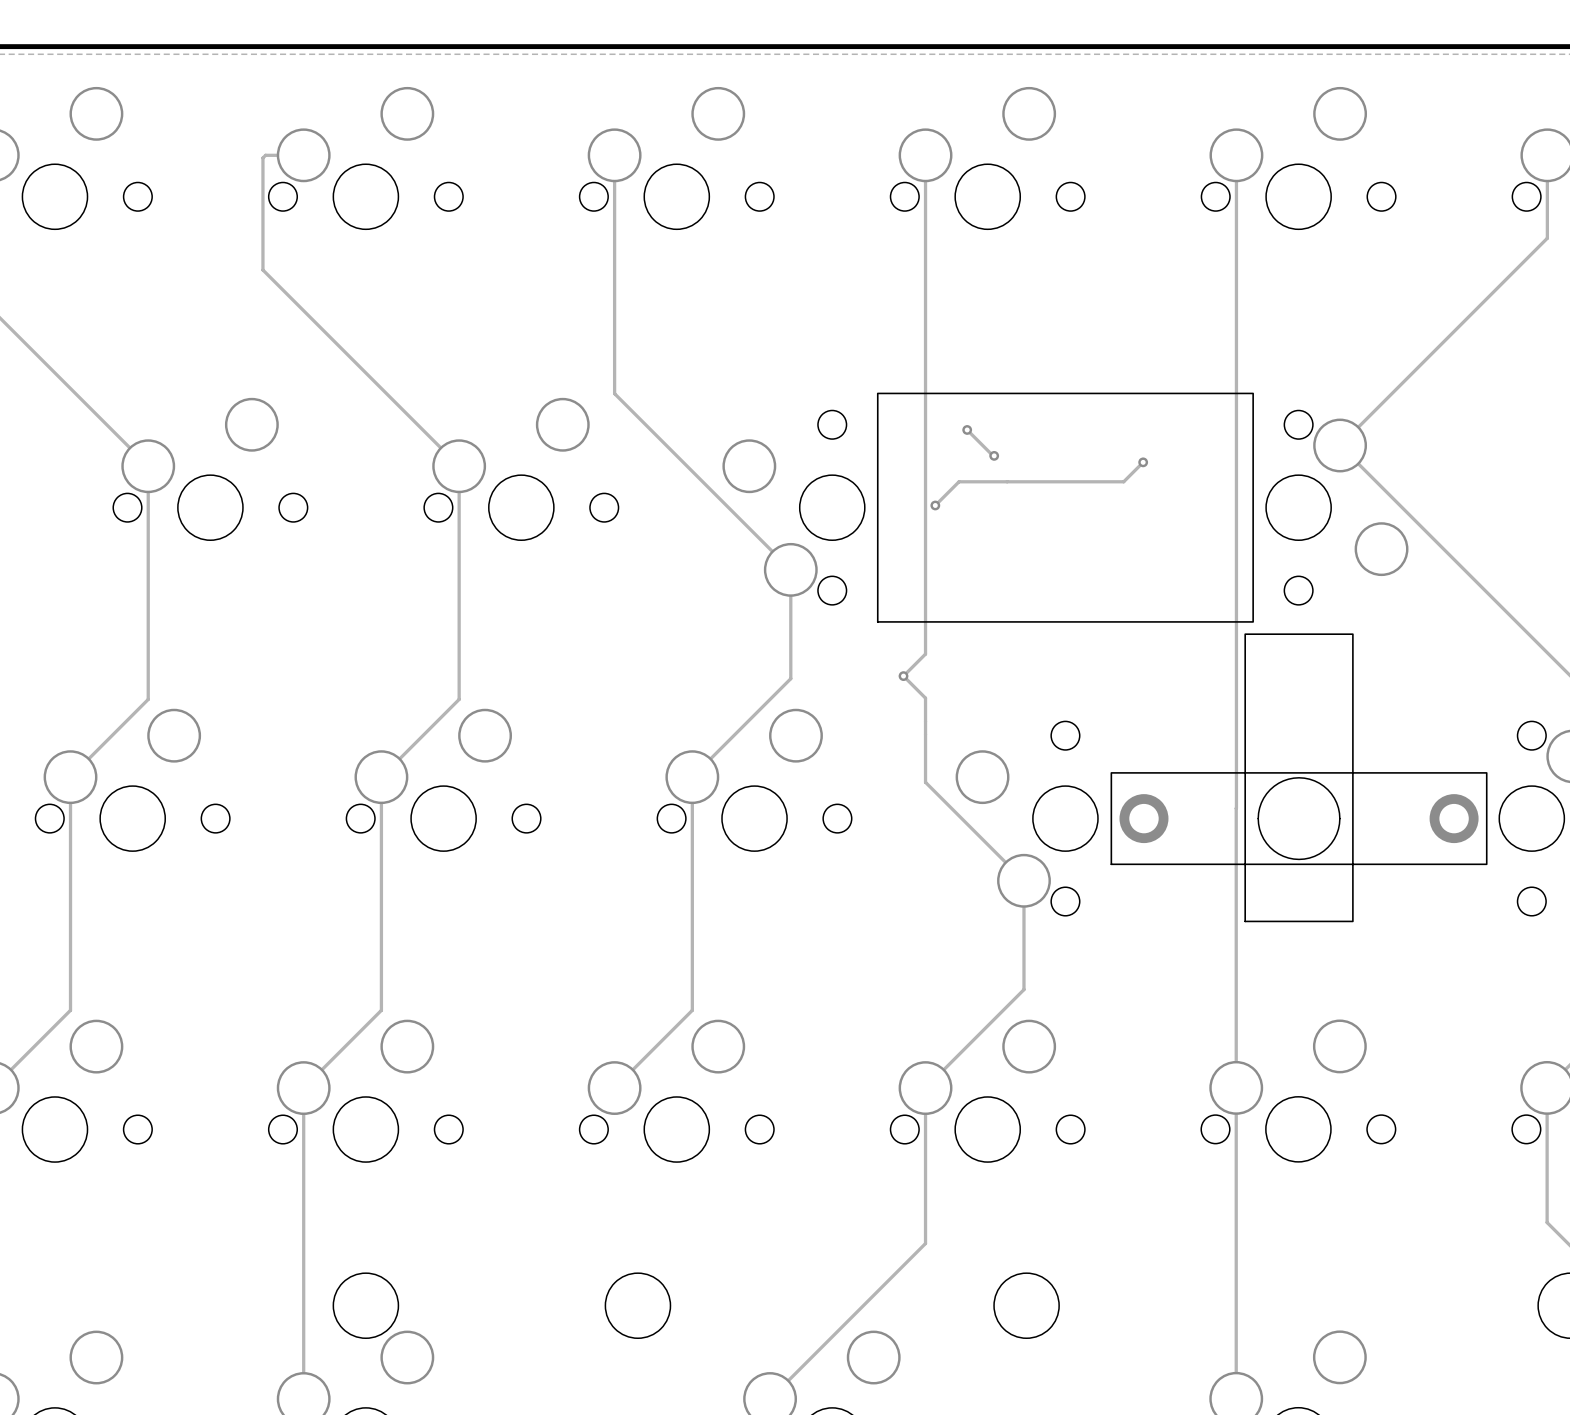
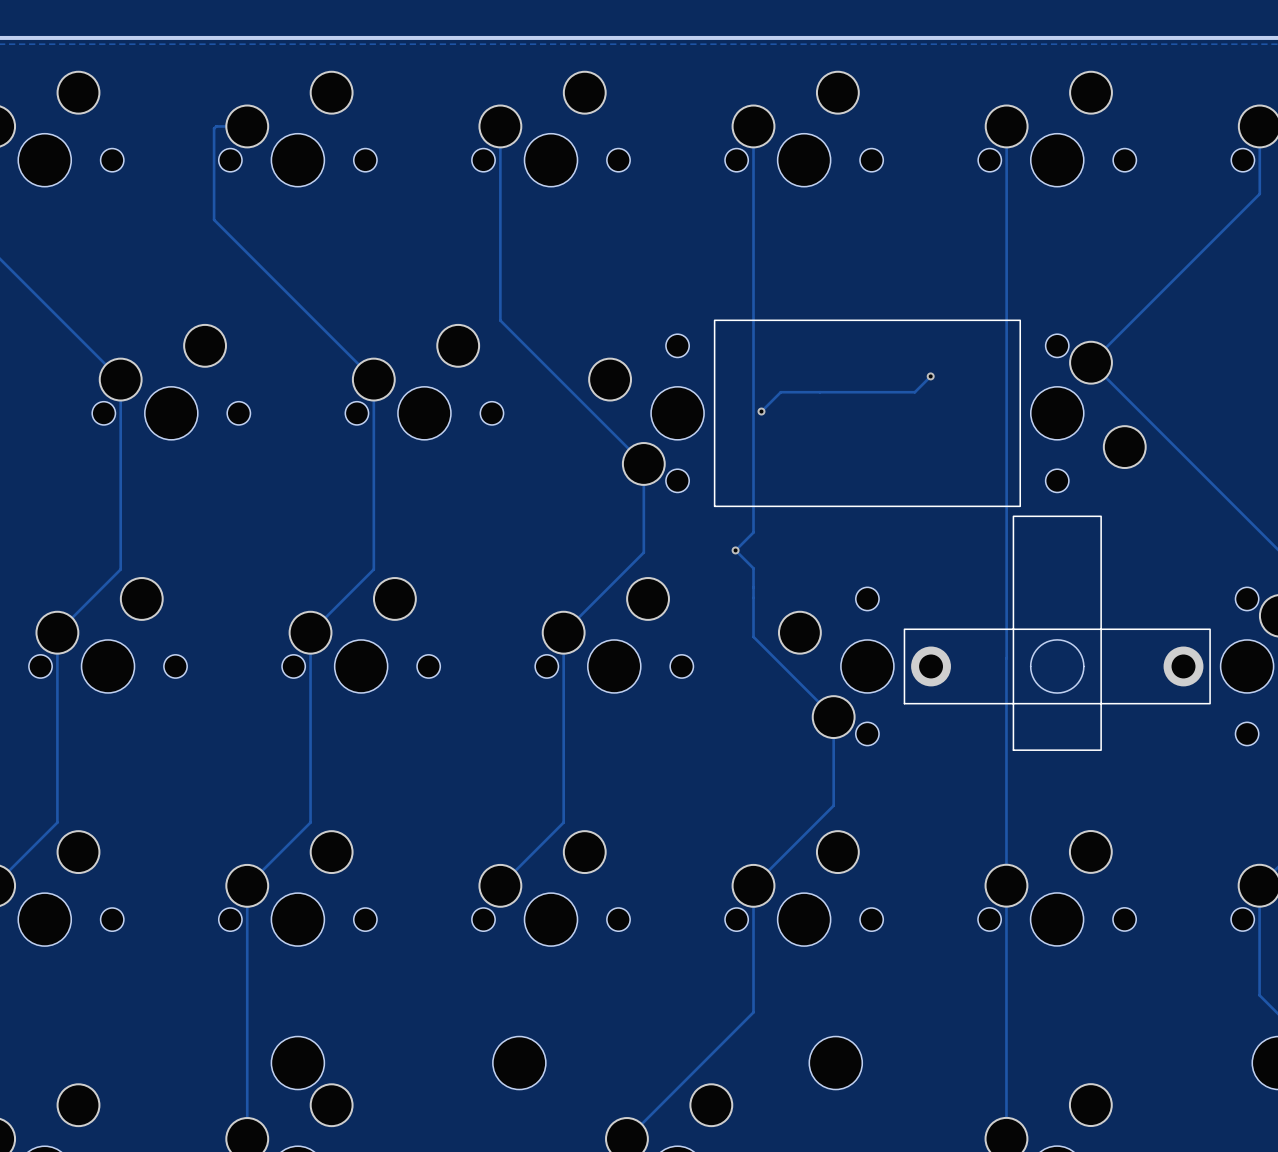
track: (967, 429) (994, 455) -> none
via: (967, 429) -> none
via: (994, 455) -> none
part footprint: [1110, 633, 1488, 923] -> [903, 515, 1211, 751]

